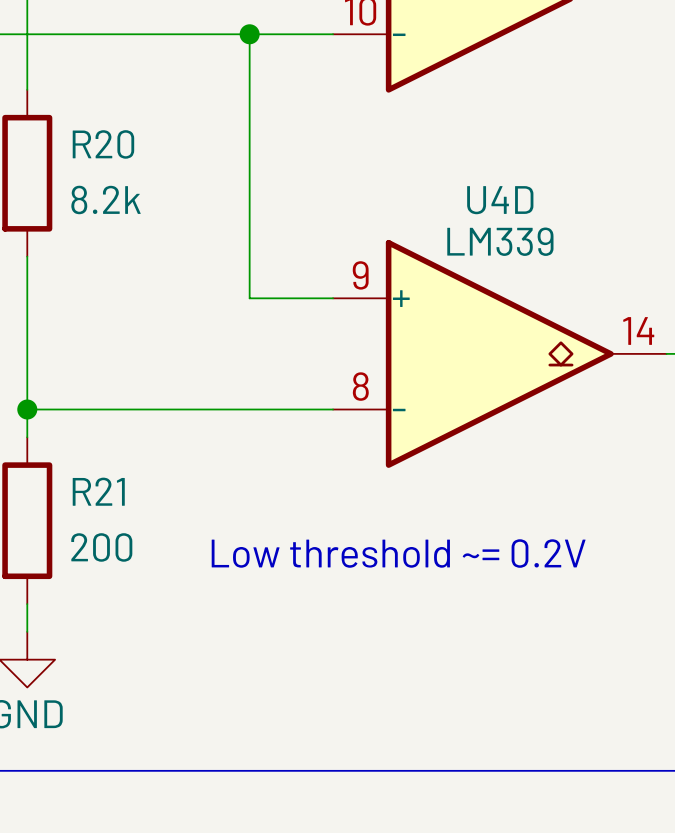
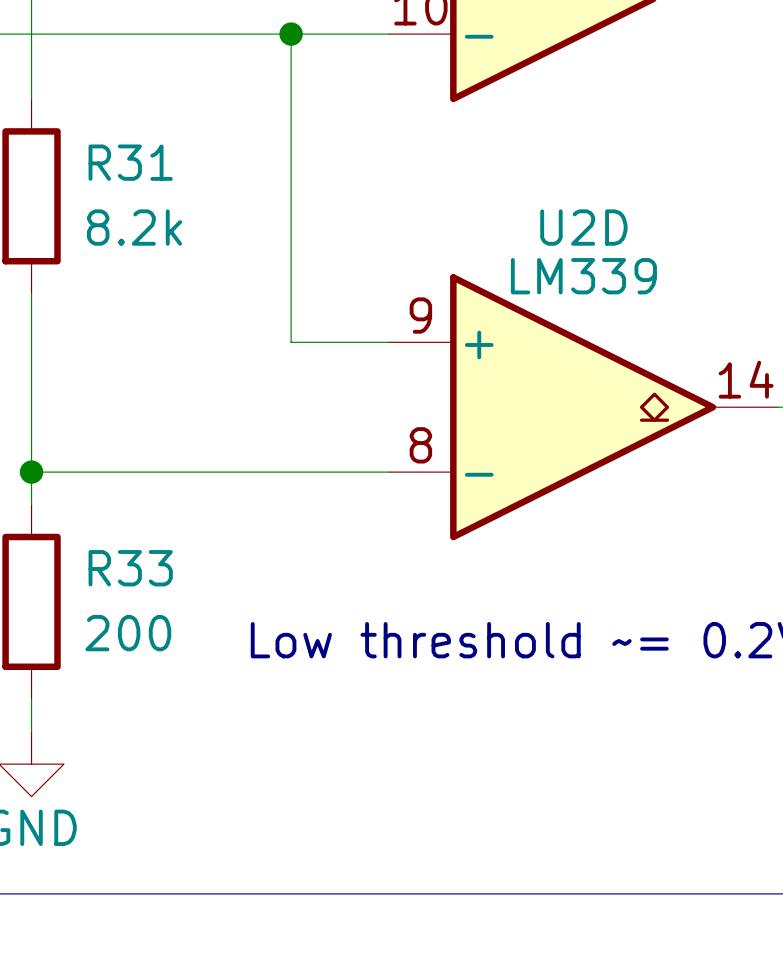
R20 name: R20 (103, 144) -> R31 (130, 162)
U4D name: U4D (500, 200) -> U2D (583, 227)
R21 name: R21 (98, 491) -> R33 (130, 568)

